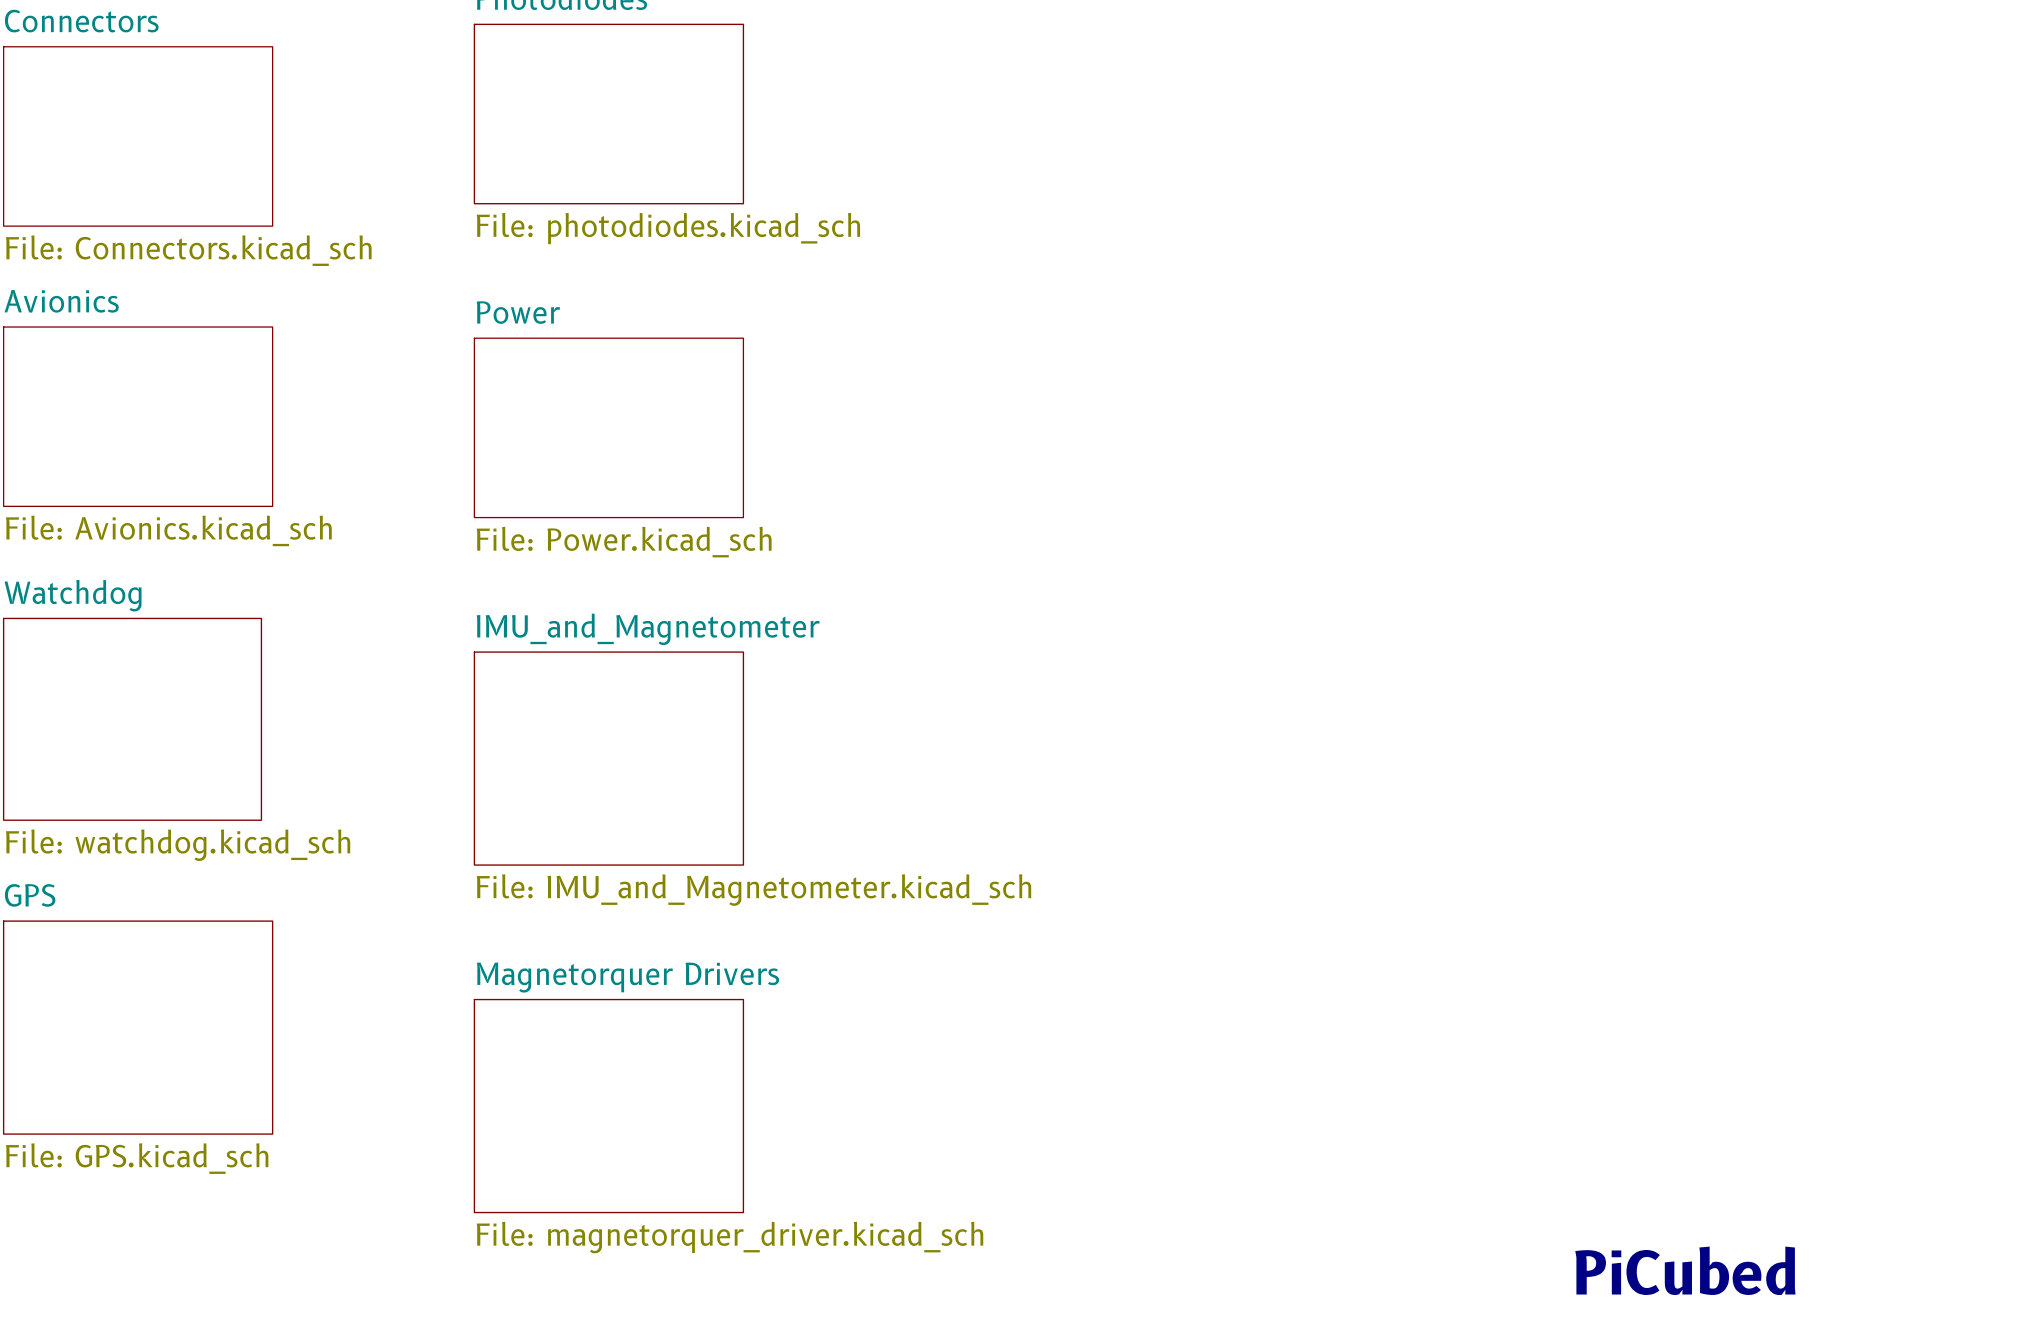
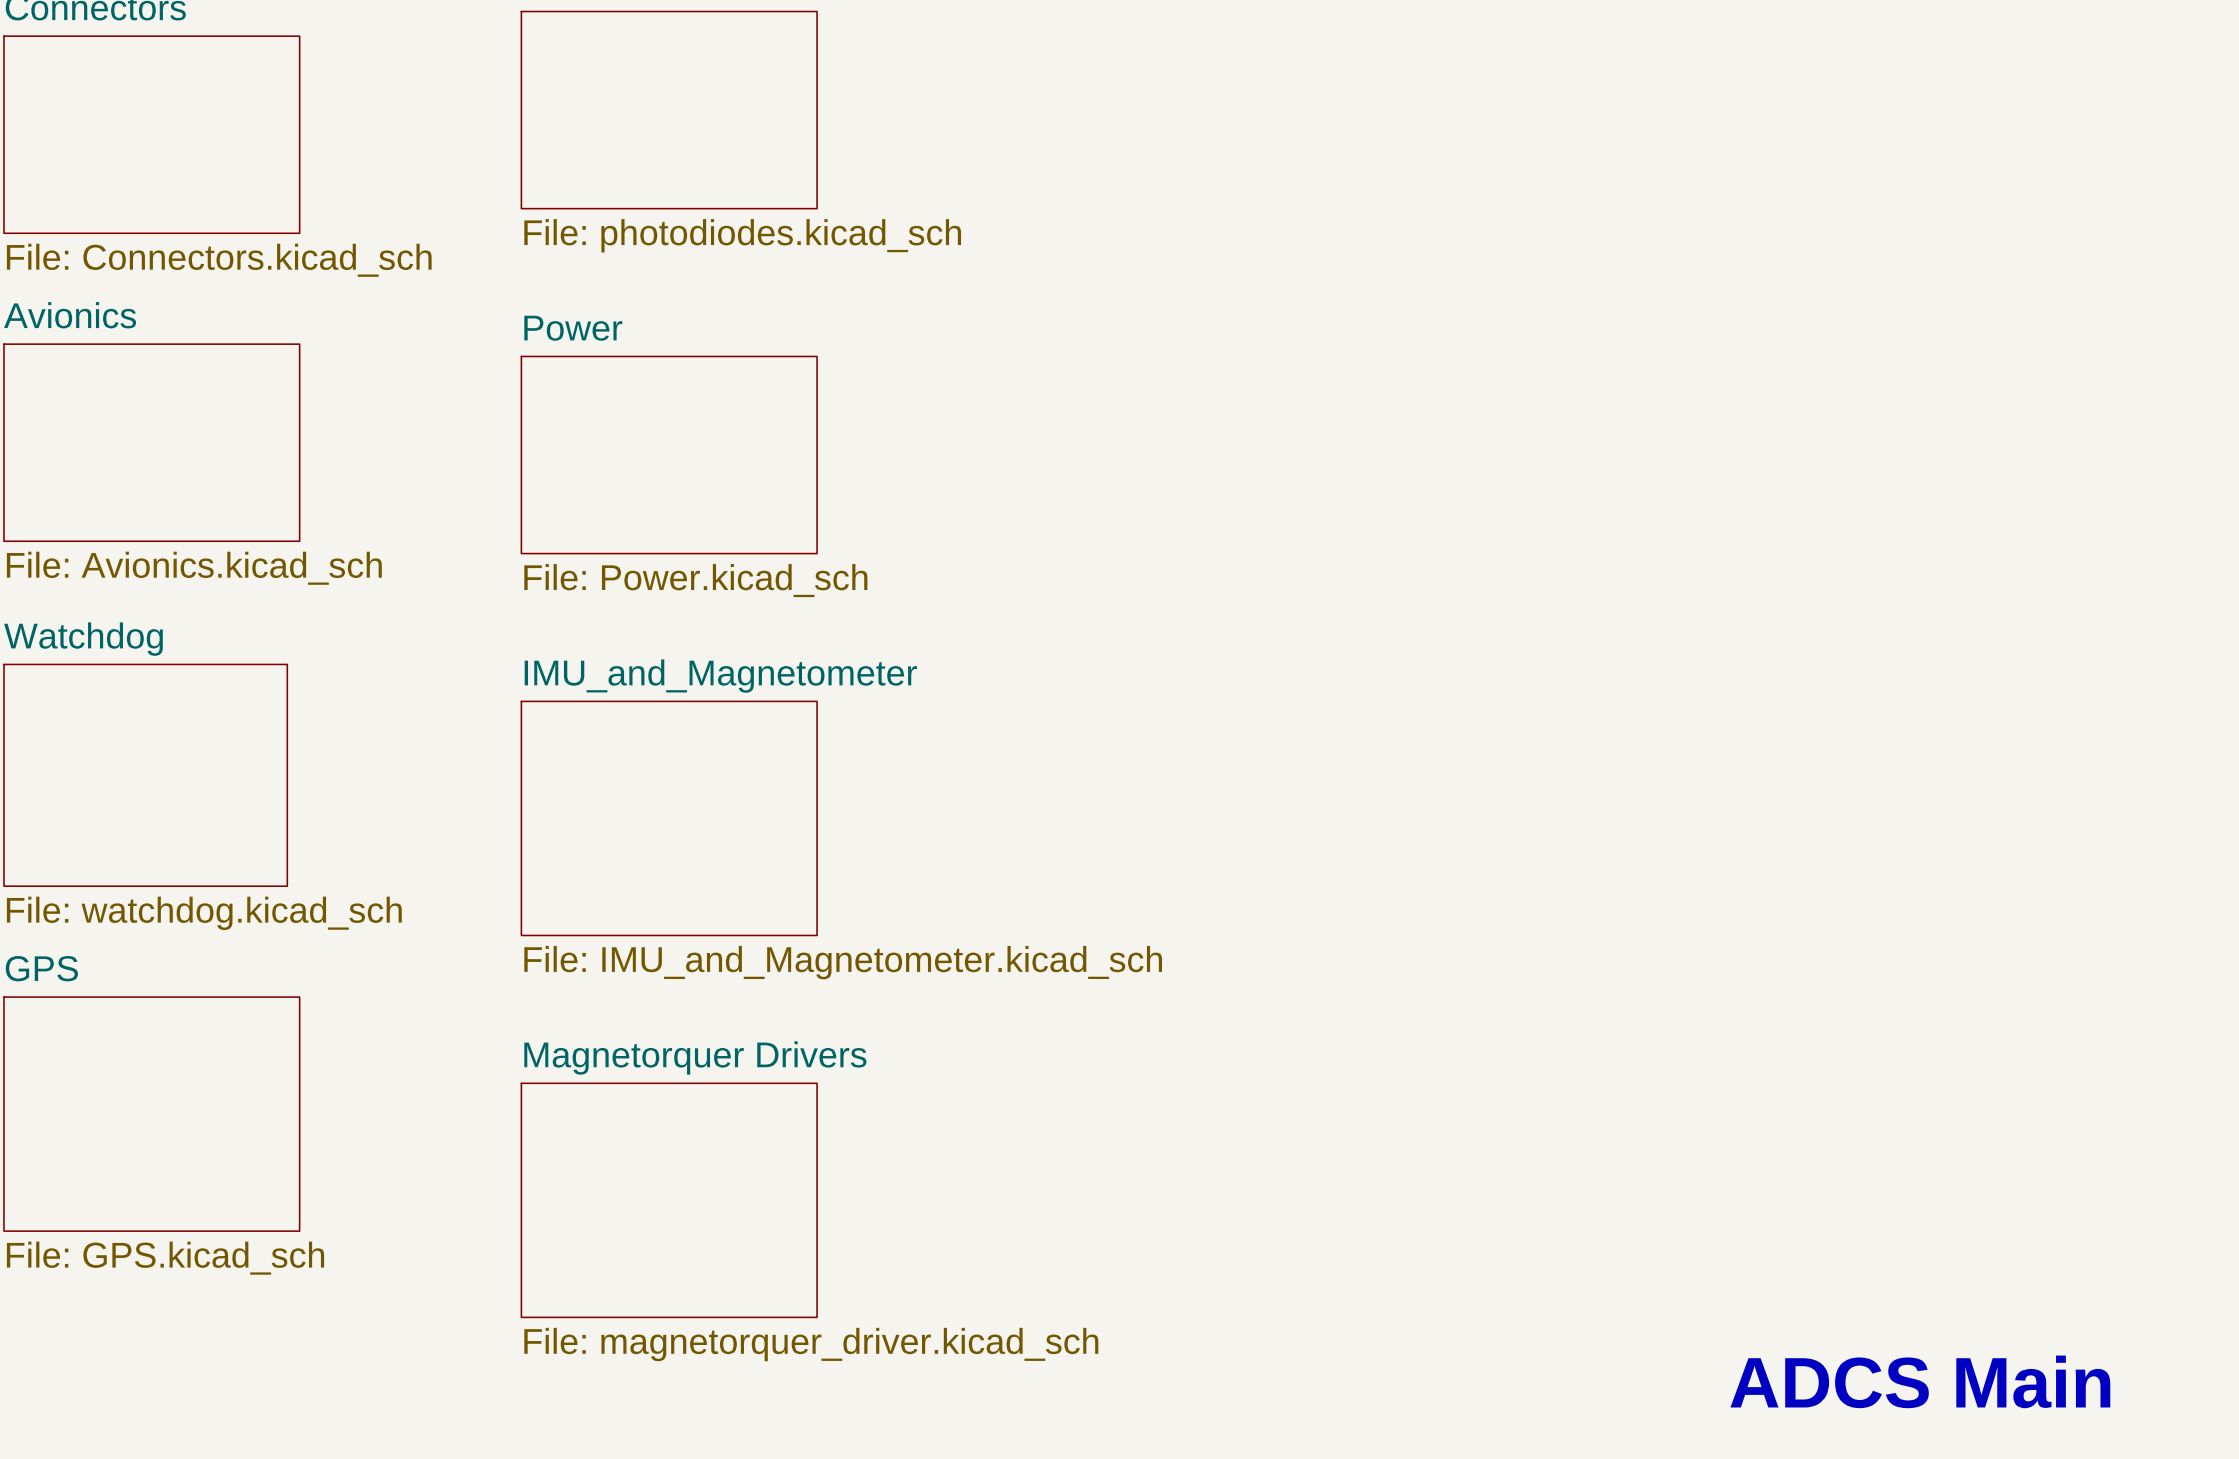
text: PiCubed (1685, 1270) -> ADCS Main (1920, 1381)

